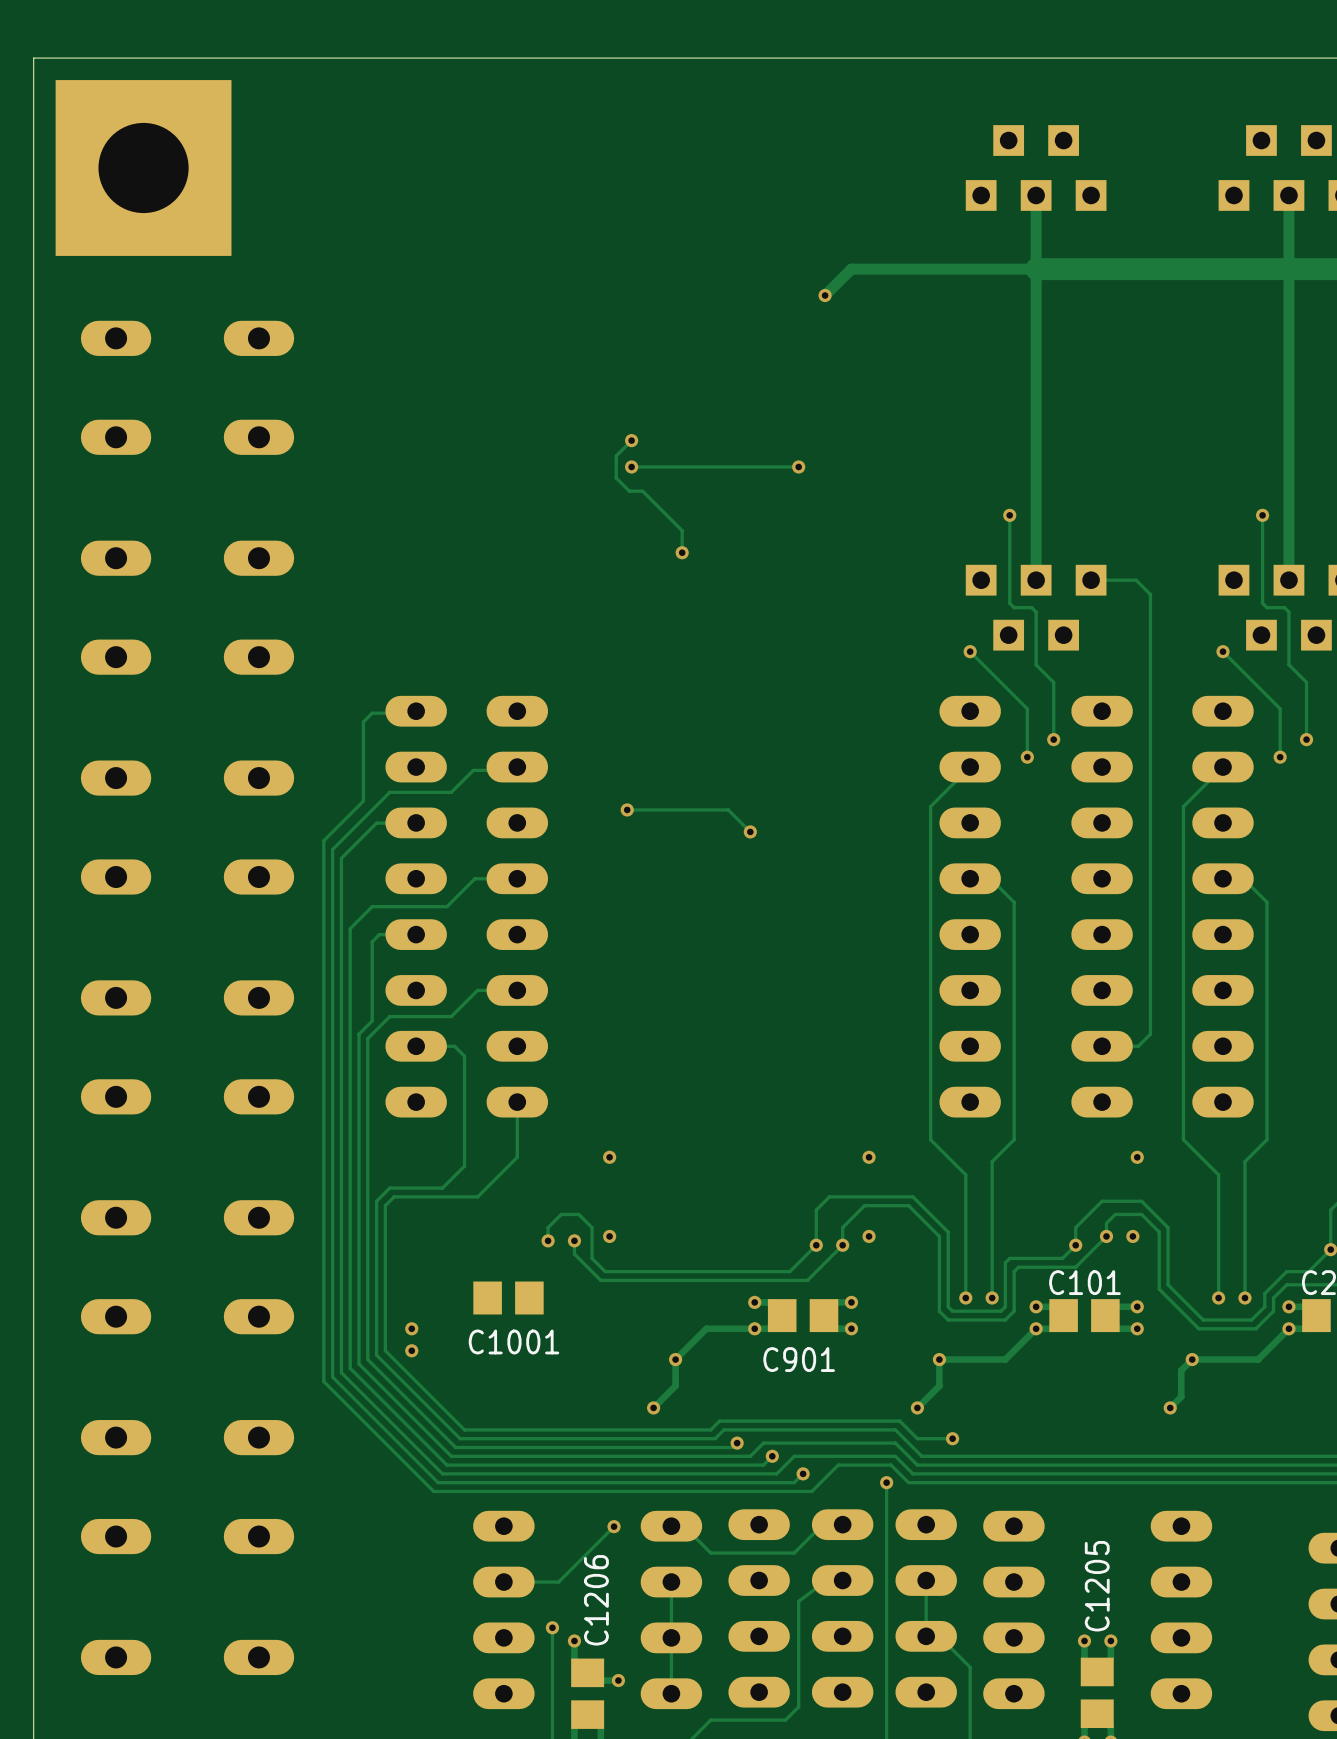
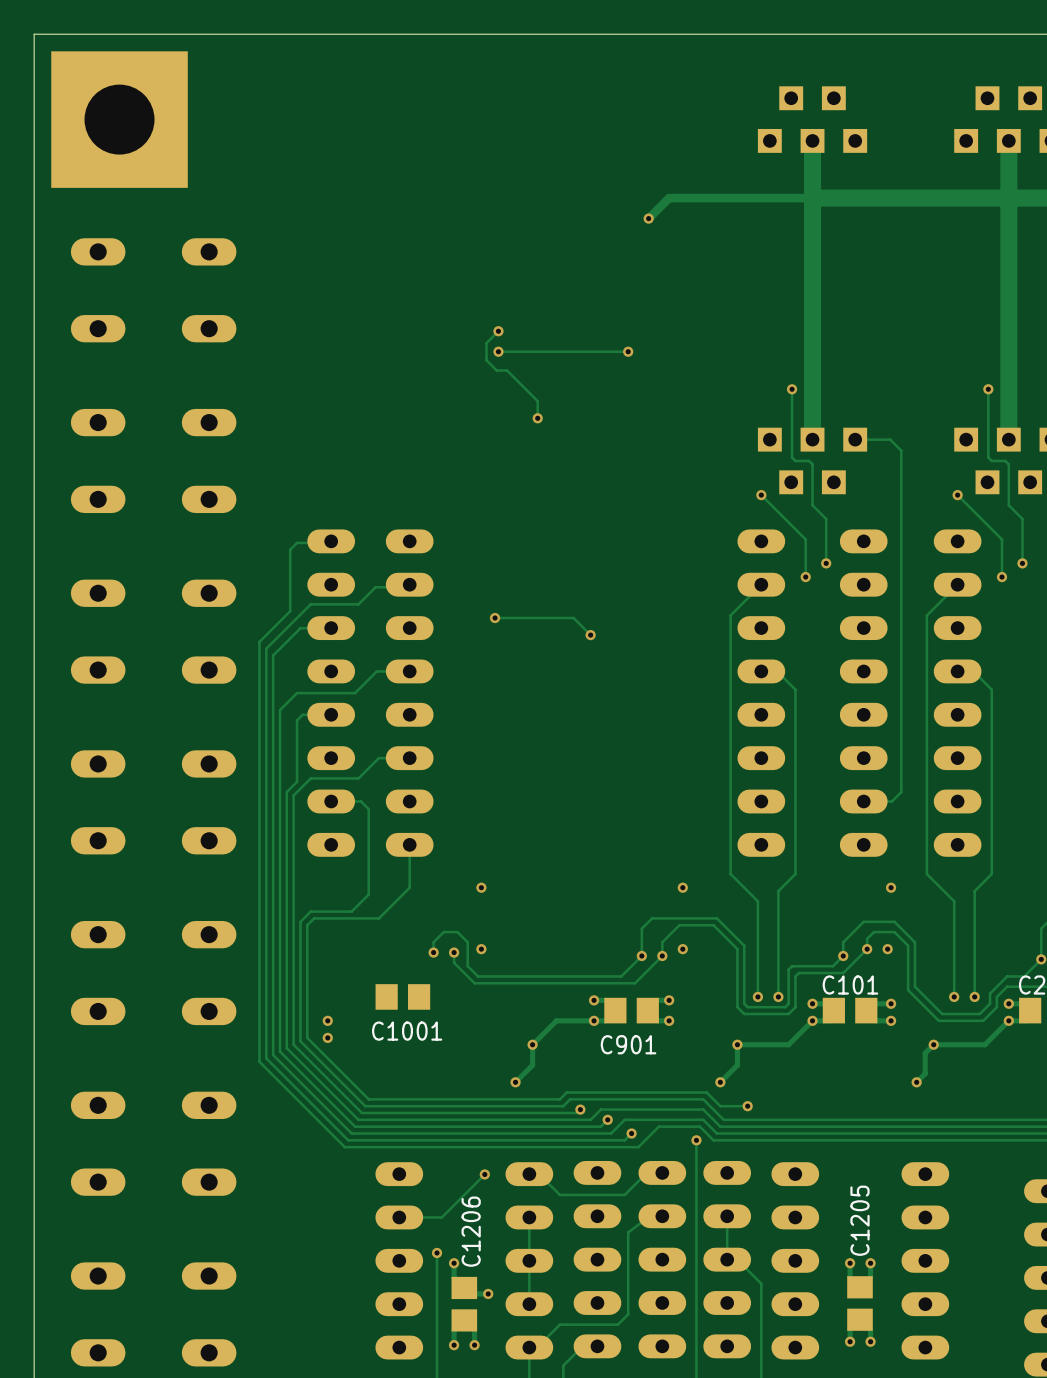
track width: thin (1036, 195) (1036, 580) -> thick (812, 140) (812, 439)
track width: thin (1288, 195) (1288, 580) -> thick (1008, 140) (1008, 439)

